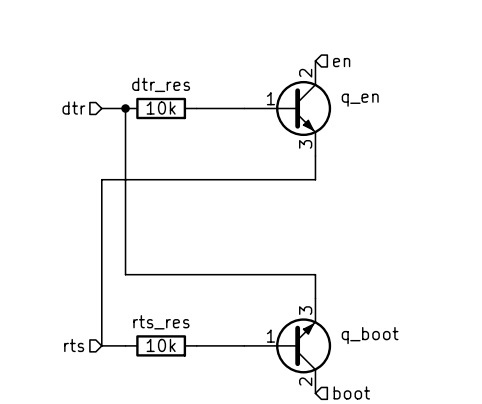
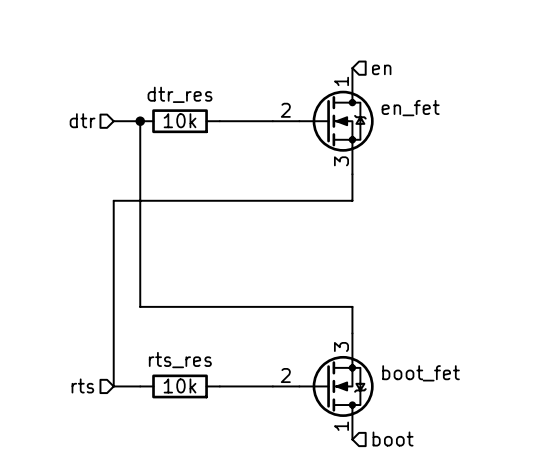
q_en: (287, 108) -> none
en_fet: none -> (323, 121)
q_boot: (287, 345) -> none
boot_fet: none -> (323, 386)

